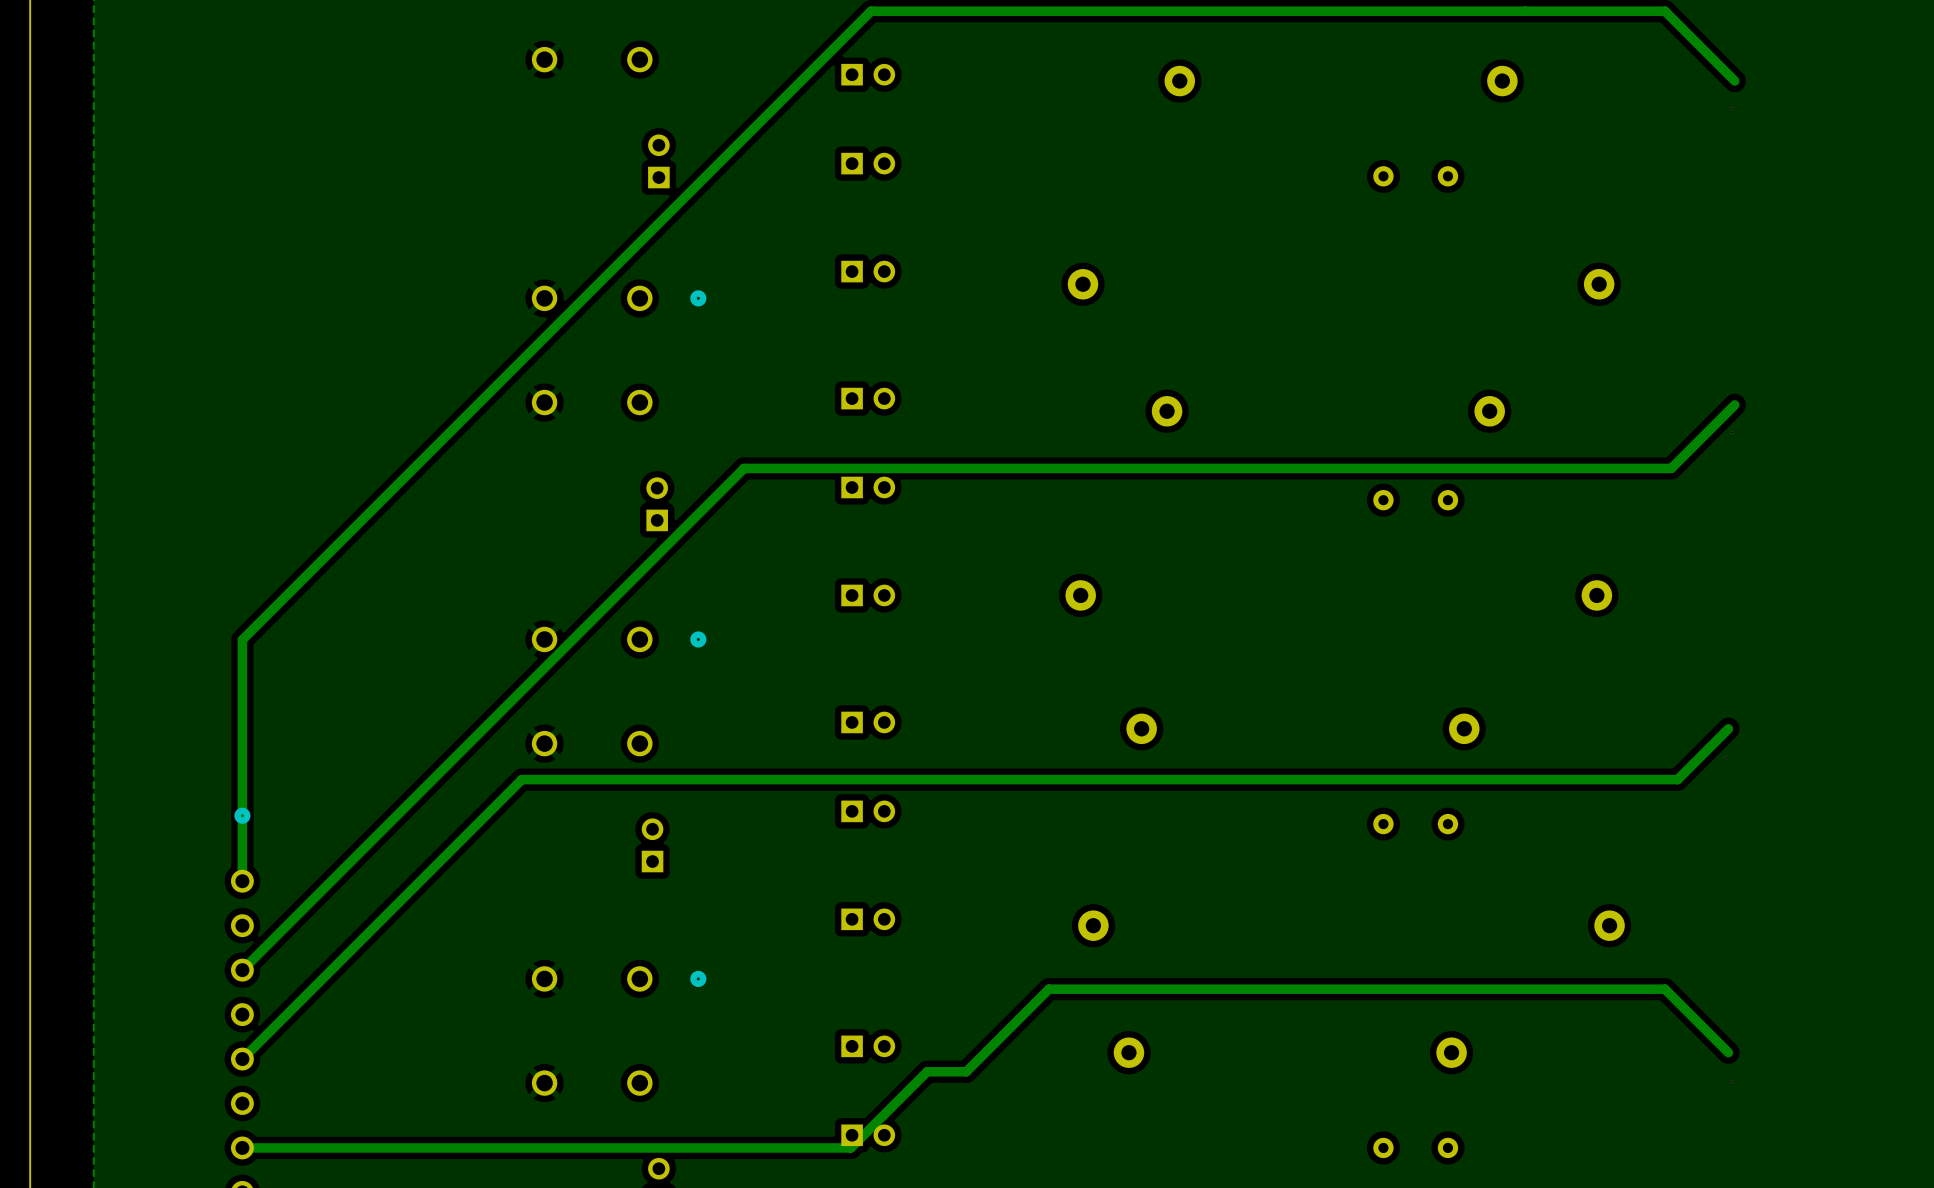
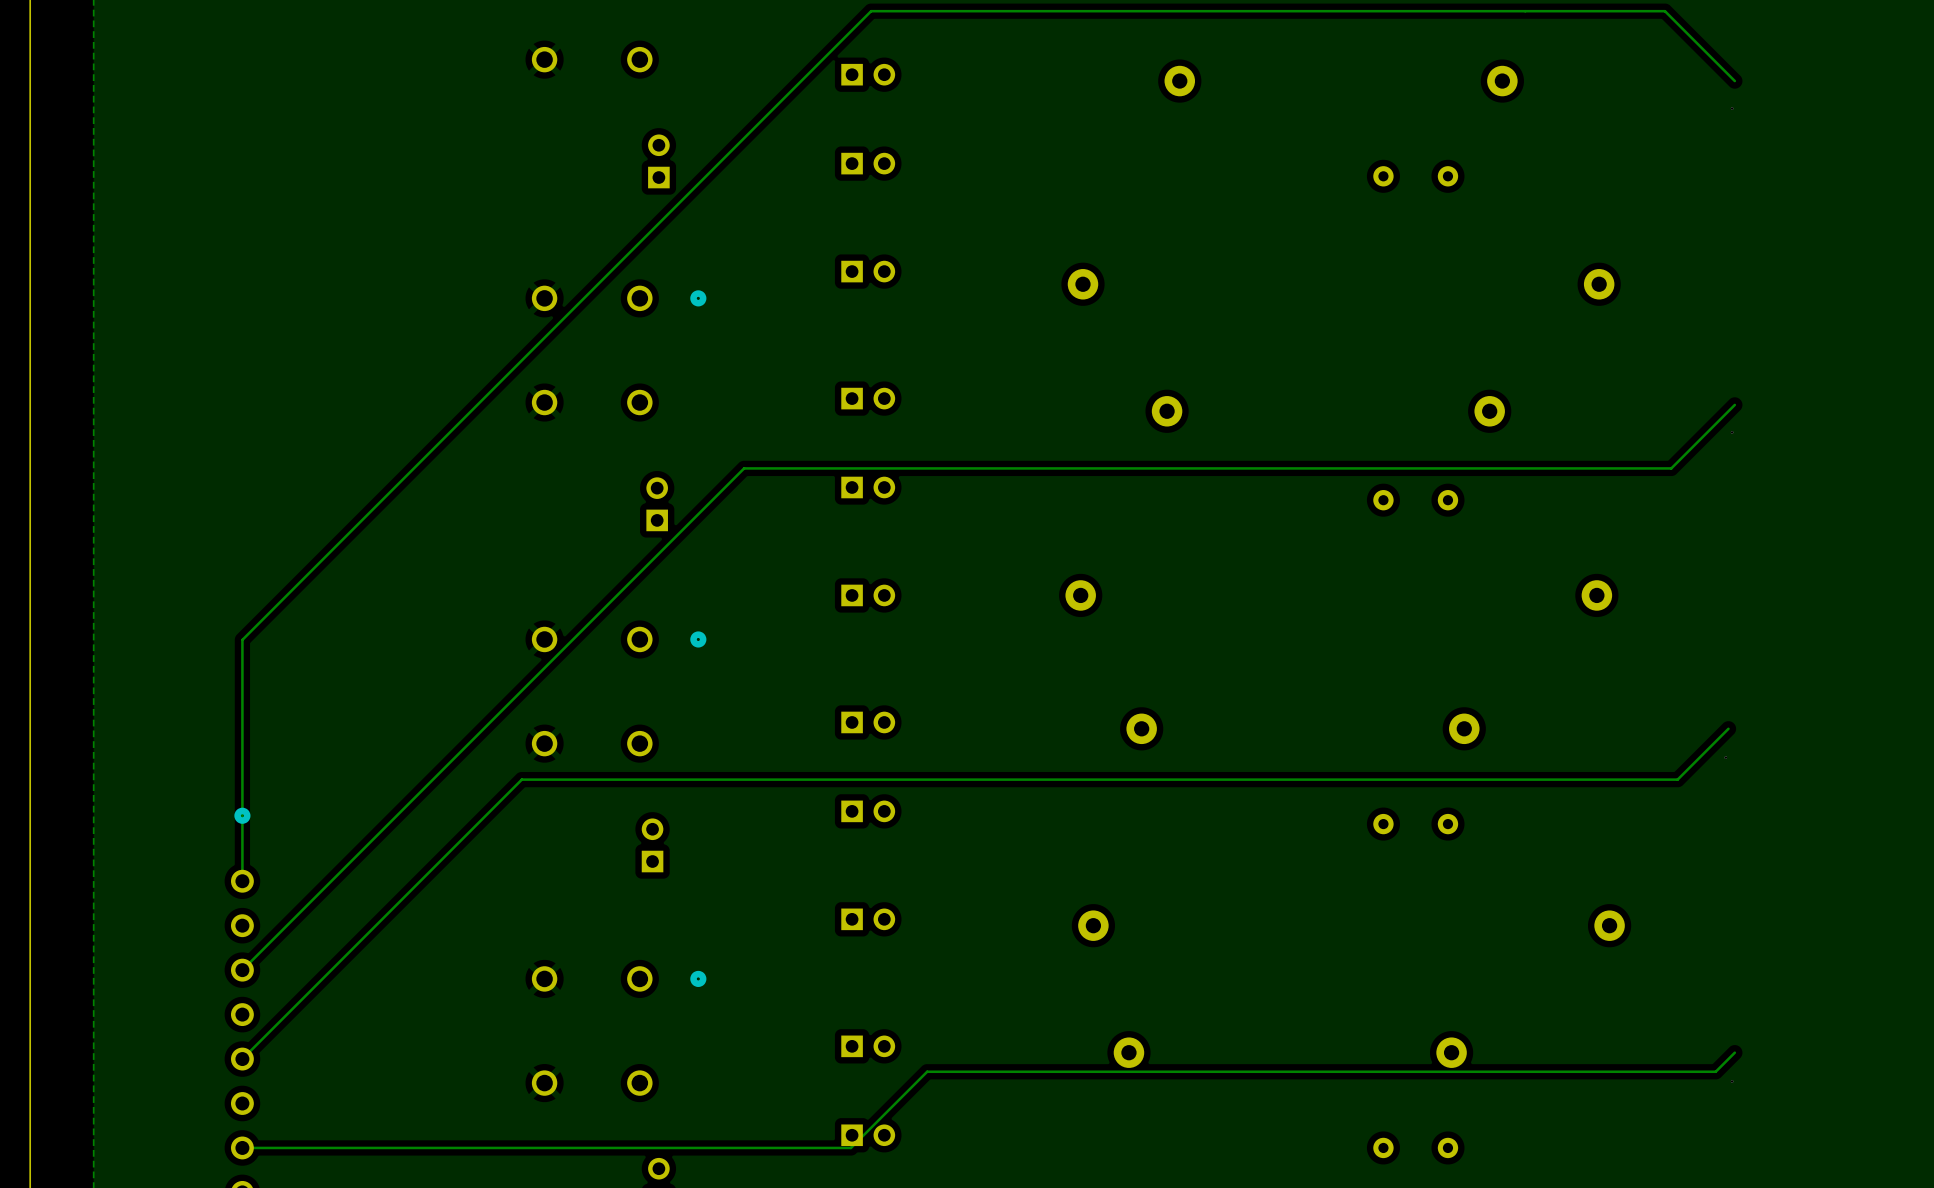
track width: thick (1734, 81) (1664, 11) (871, 11) (242, 639) (242, 881) -> thin (1734, 81) (1664, 11) (871, 11) (242, 639) (242, 881)
track width: thick (1734, 404) (1671, 468) (744, 468) (242, 970) -> thin (1734, 404) (1671, 468) (744, 468) (242, 970)
track width: thick (1728, 728) (1677, 779) (521, 779) (242, 1059) -> thin (1728, 728) (1677, 779) (521, 779) (242, 1059)
track: (1728, 1052) (1664, 989) (1048, 989) (966, 1071) -> (1734, 1052) (1715, 1071) (966, 1071)
track width: thick (966, 1071) (927, 1071) (850, 1147) (242, 1147) -> thin (966, 1071) (927, 1071) (850, 1147) (242, 1147)

